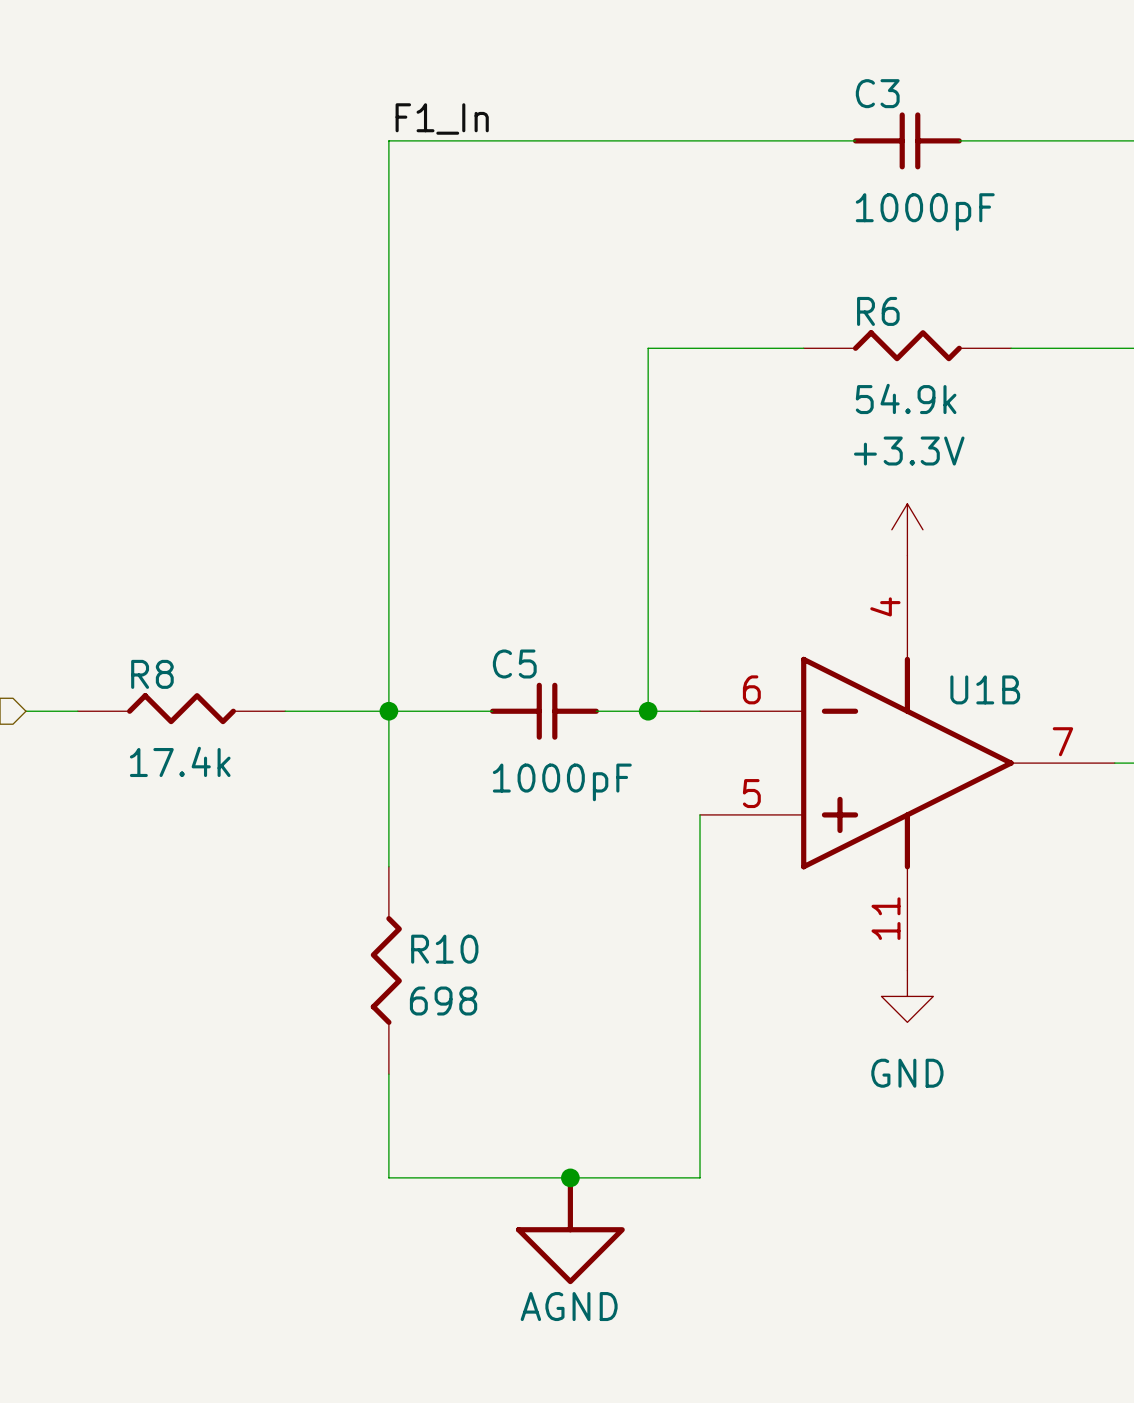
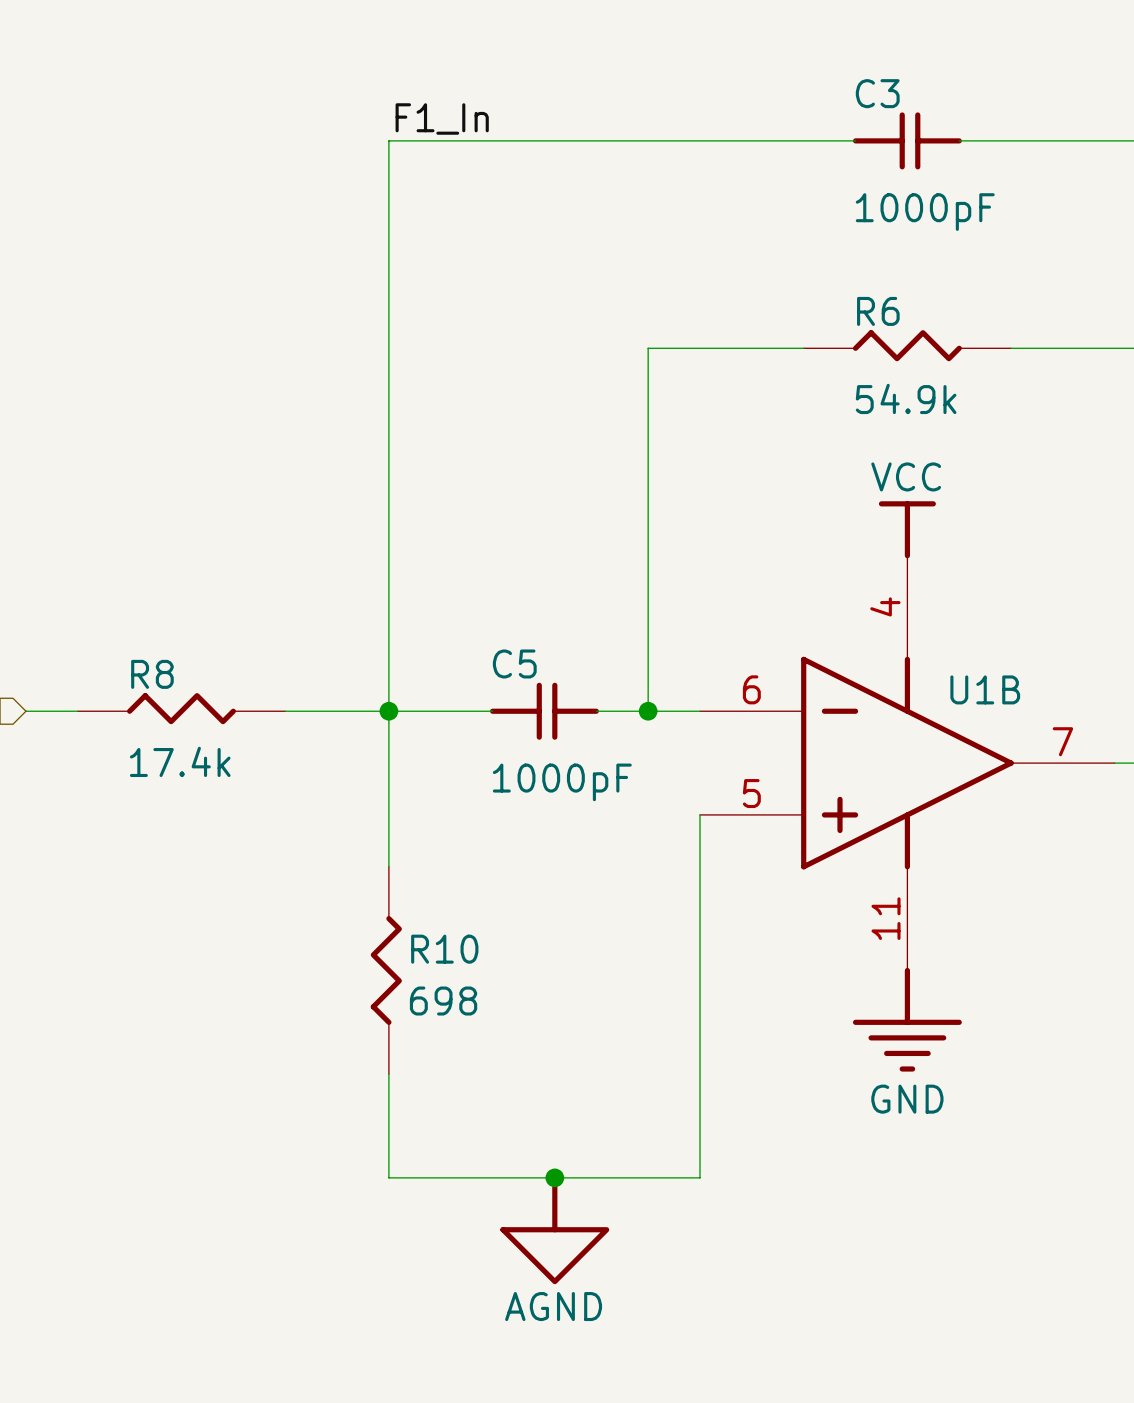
power symbol: +3.3V (907, 529) -> VCC (907, 529)
power symbol: GND (907, 996) -> none
power symbol: none -> GND (907, 1019)
junction position: (570, 1177) -> (554, 1177)
power symbol position: AGND (570, 1229) -> AGND (554, 1229)

